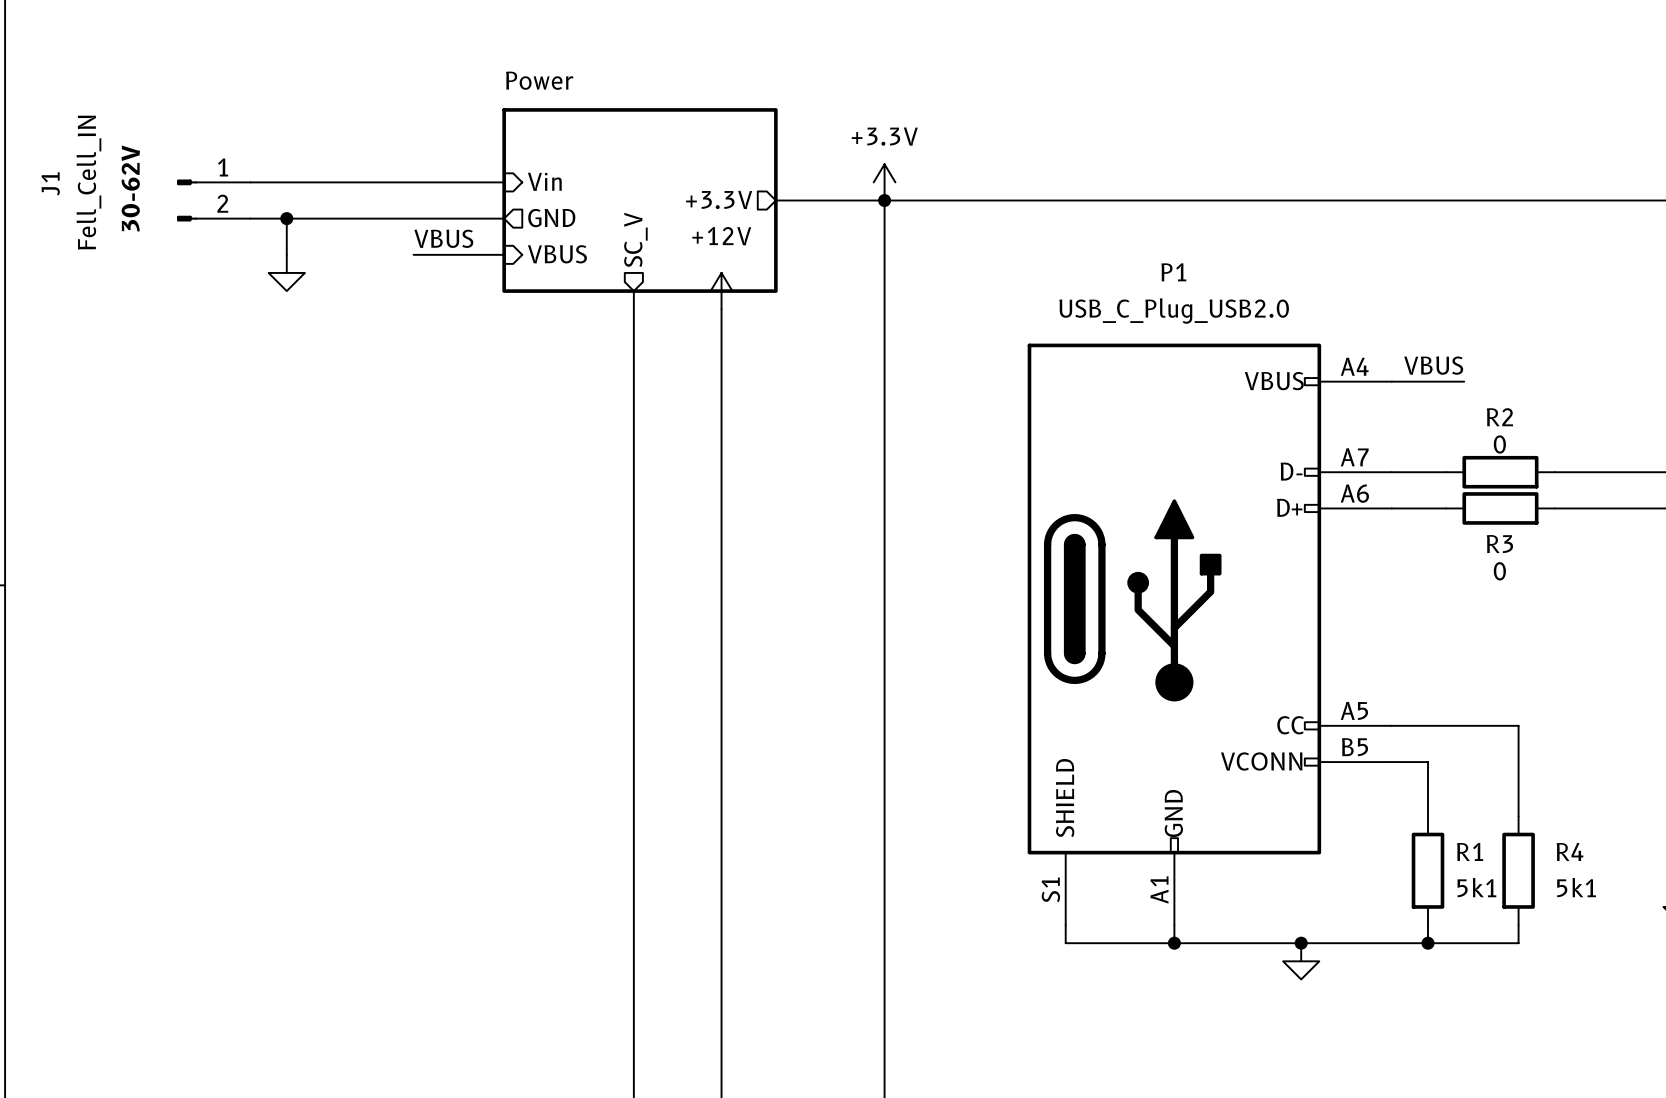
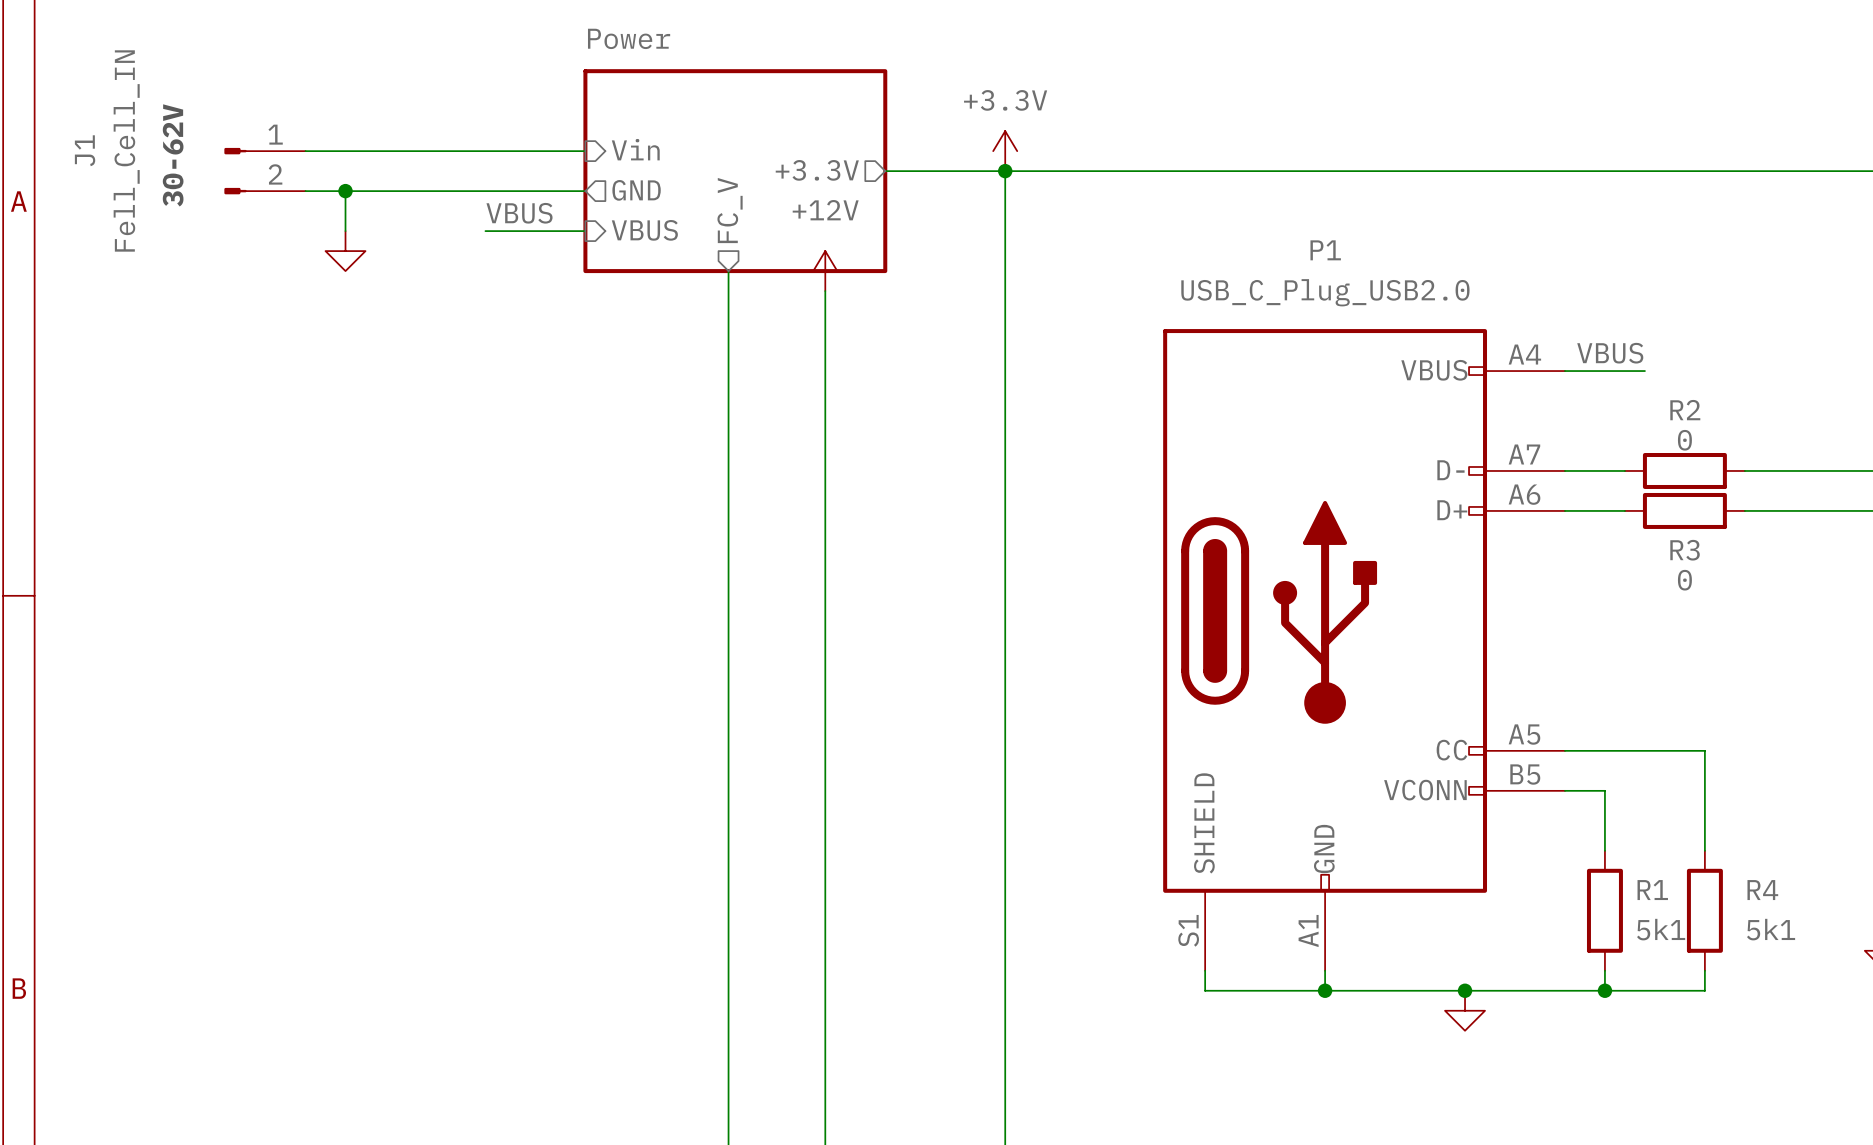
sheet pin: SC_V (635, 239) -> FC_V (730, 210)

